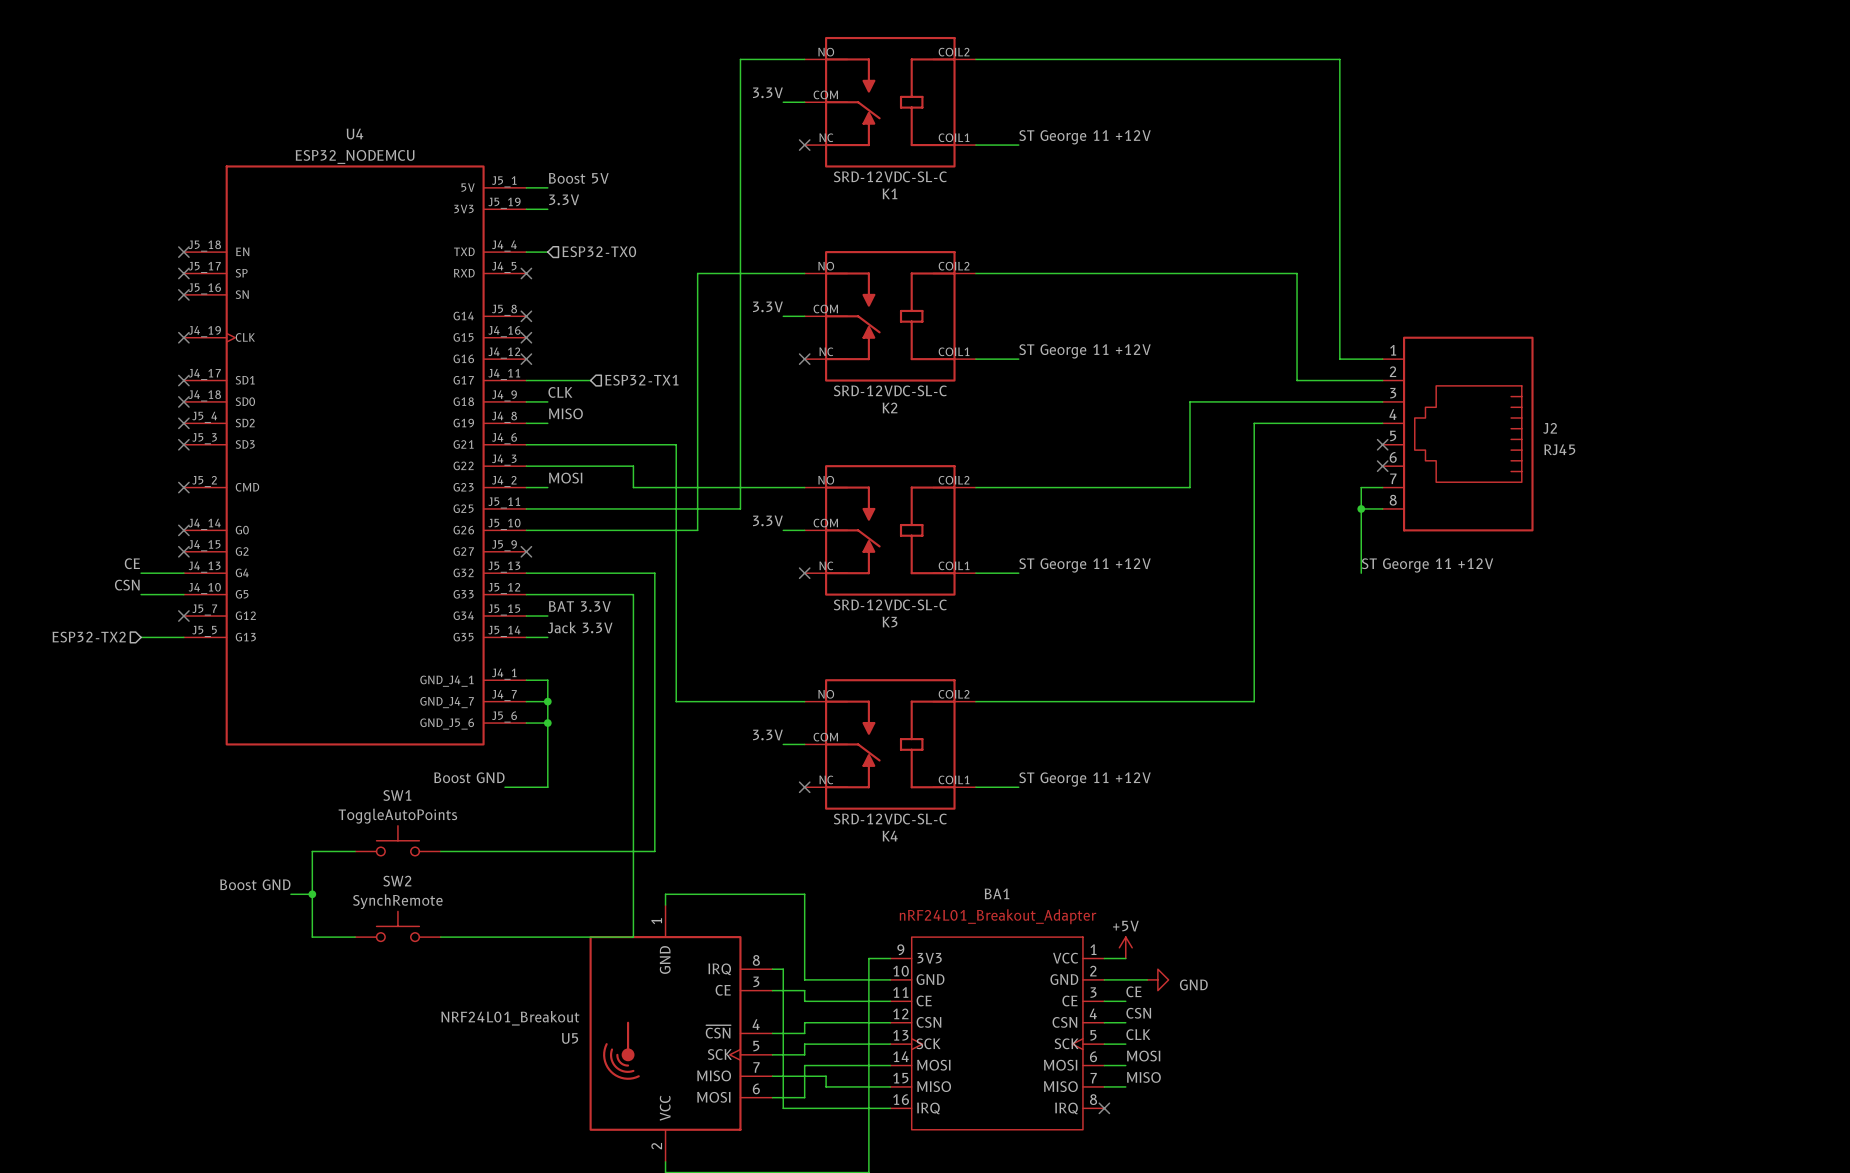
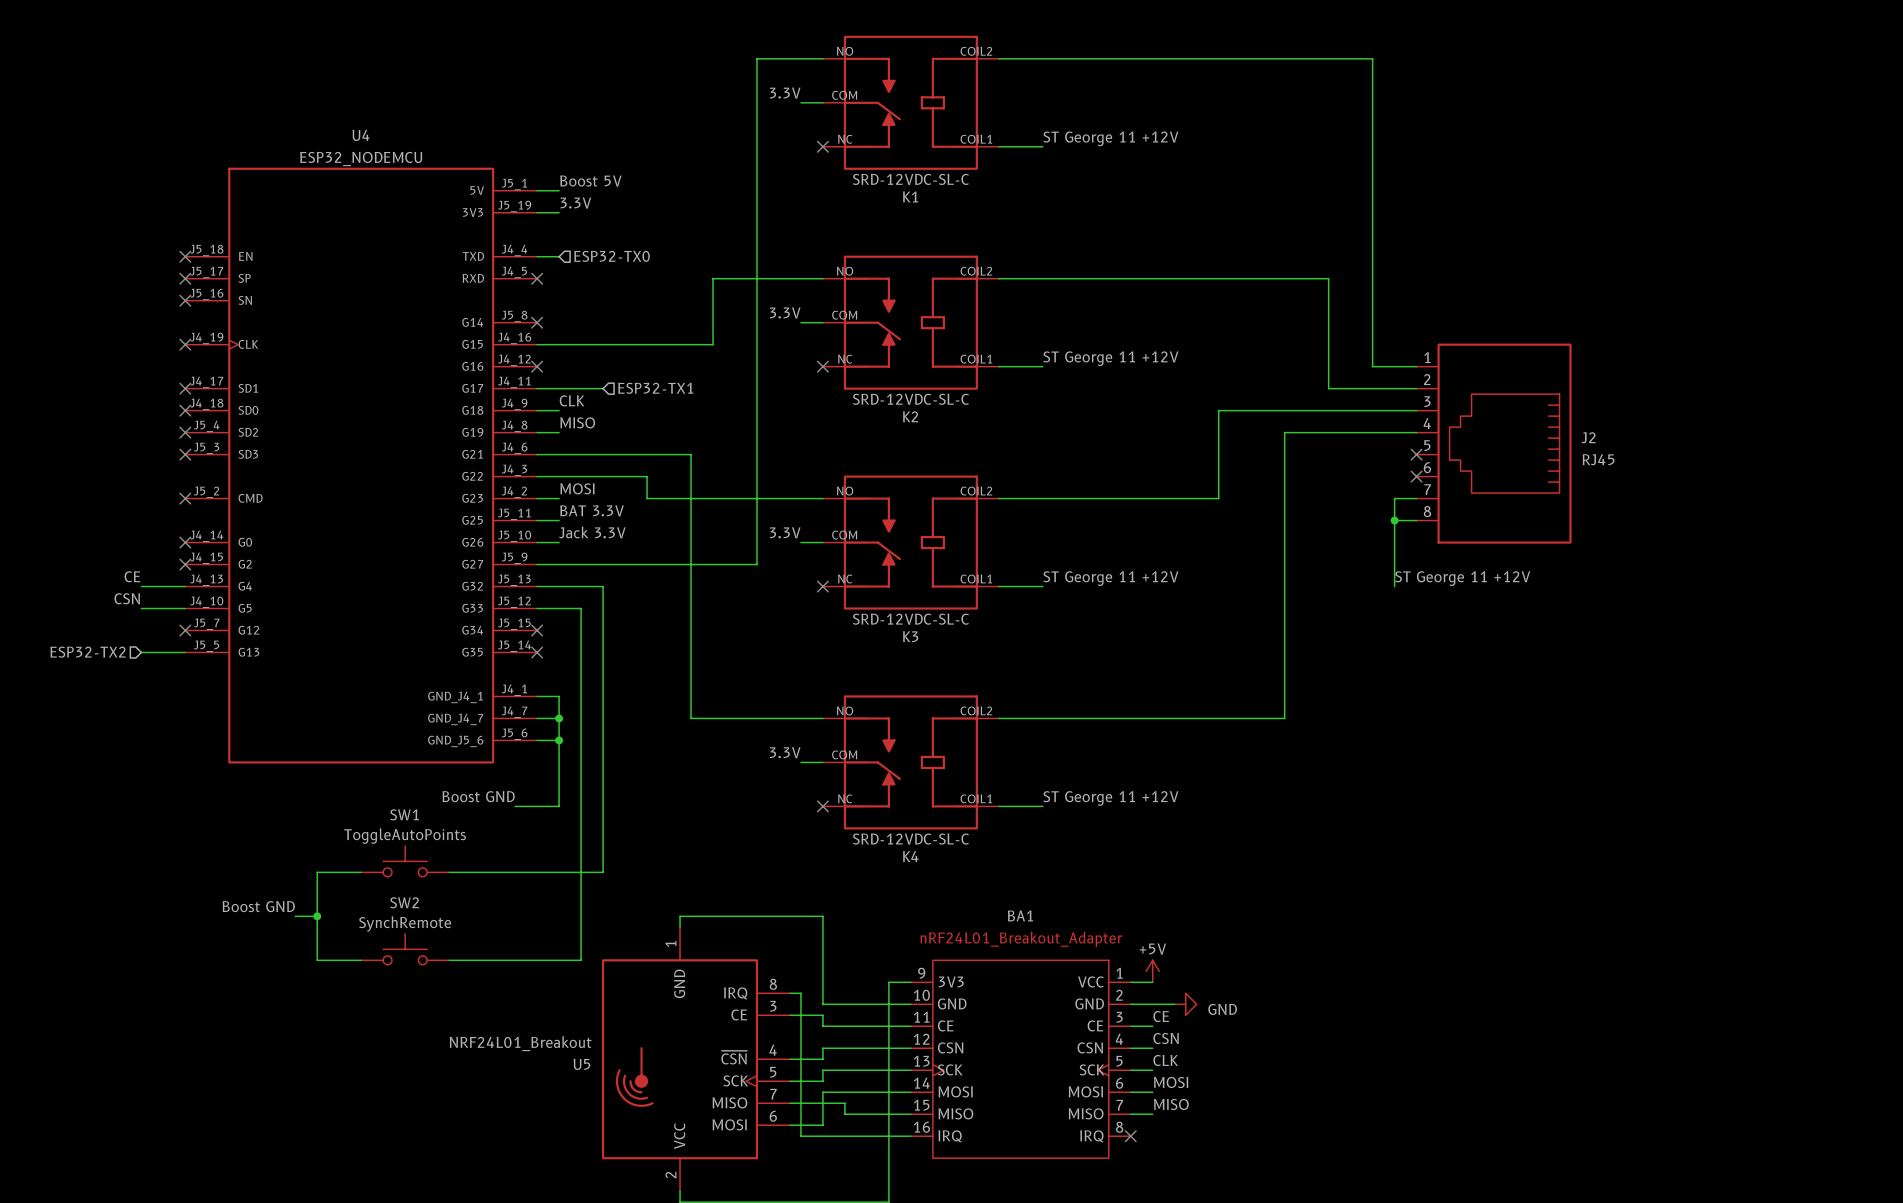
no-connect mark: (526, 337) -> none
wire: (697, 337) (697, 530) (547, 530) -> (713, 344) (537, 344)
wire: (547, 508) (740, 508) -> (537, 564) (756, 564) (756, 520)
no-connect mark: (526, 551) -> none
wire: (590, 573) (654, 573) (654, 851) (590, 851) -> (603, 586) (603, 872)
wire: (569, 594) (633, 594) (633, 937) (569, 937) -> (581, 608) (581, 960)
label position: BAT 3.3V (579, 606) -> BAT 3.3V (592, 510)
wire: (526, 616) (547, 616) -> none
no-connect mark: none -> (537, 630)
label position: Jack 3.3V (580, 627) -> Jack 3.3V (592, 532)
wire: (526, 637) (547, 637) -> none
no-connect mark: none -> (537, 652)

